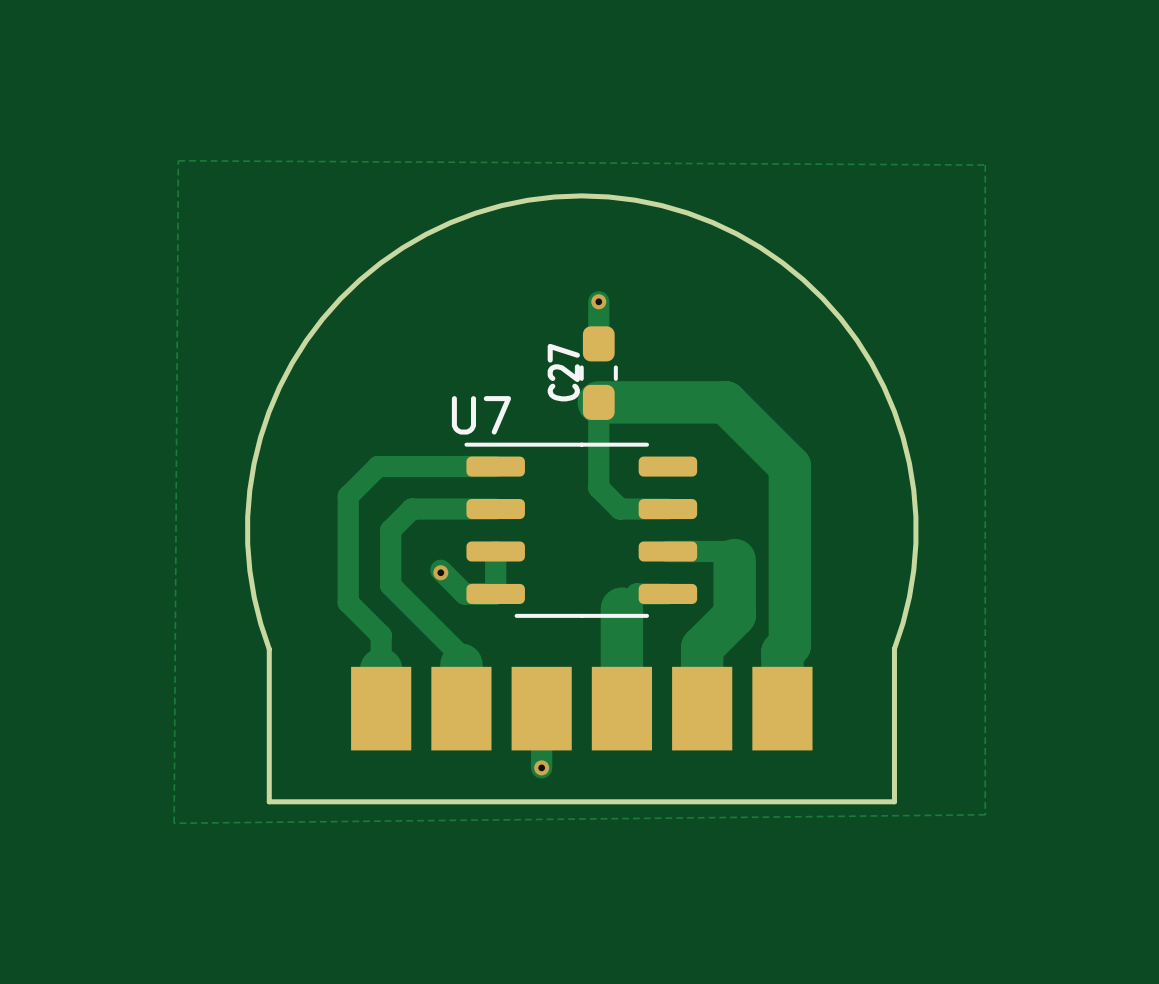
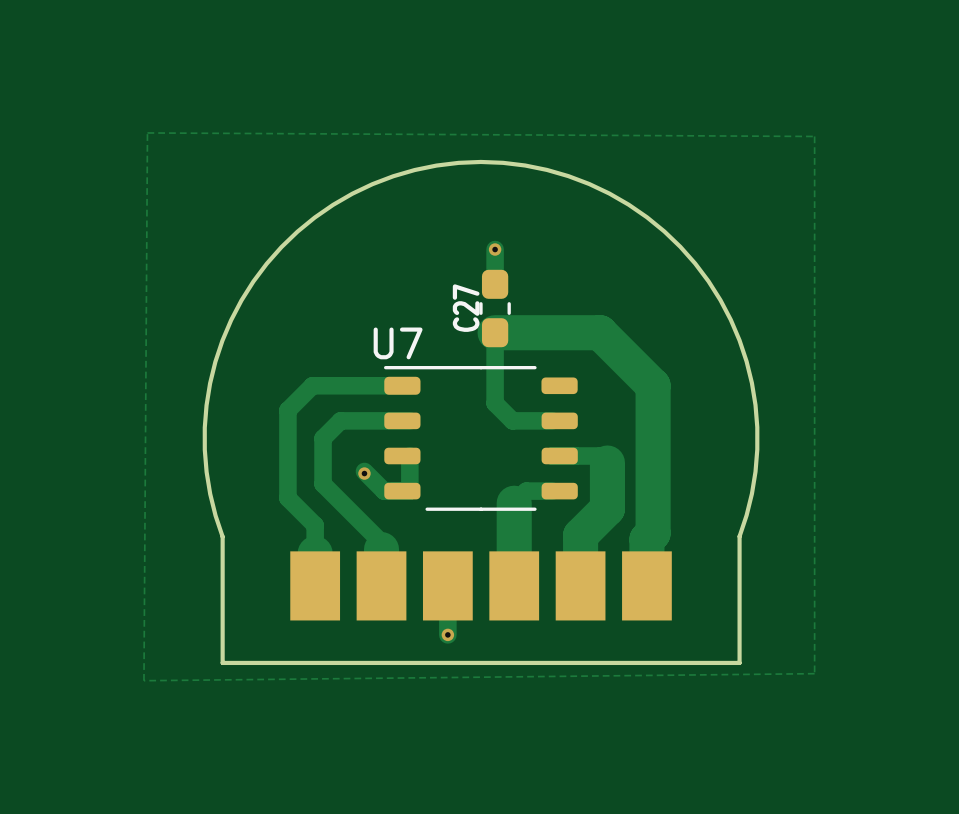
U7 footprint: [464, 442, 698, 618] -> [384, 366, 578, 511]

